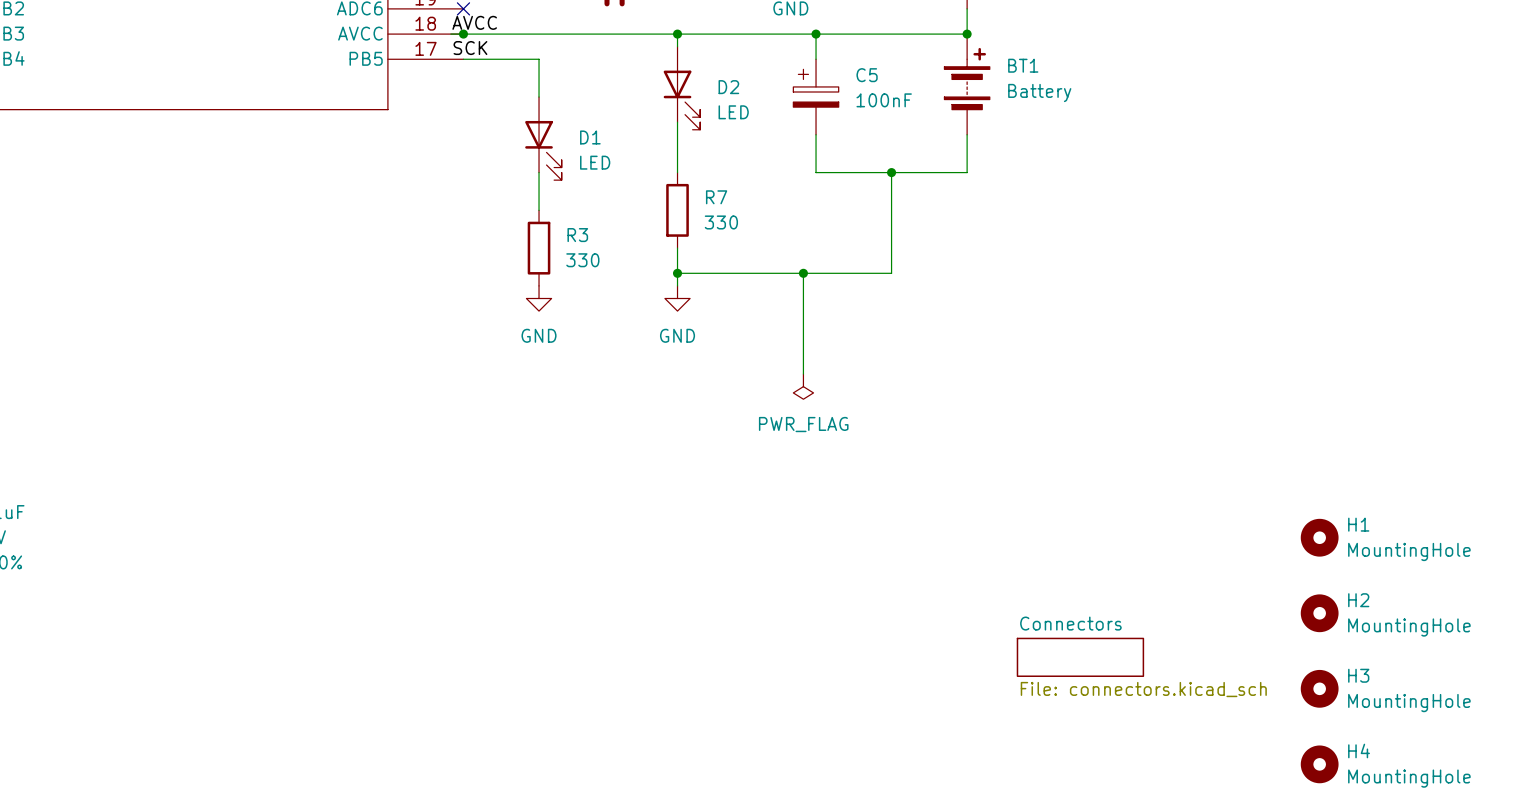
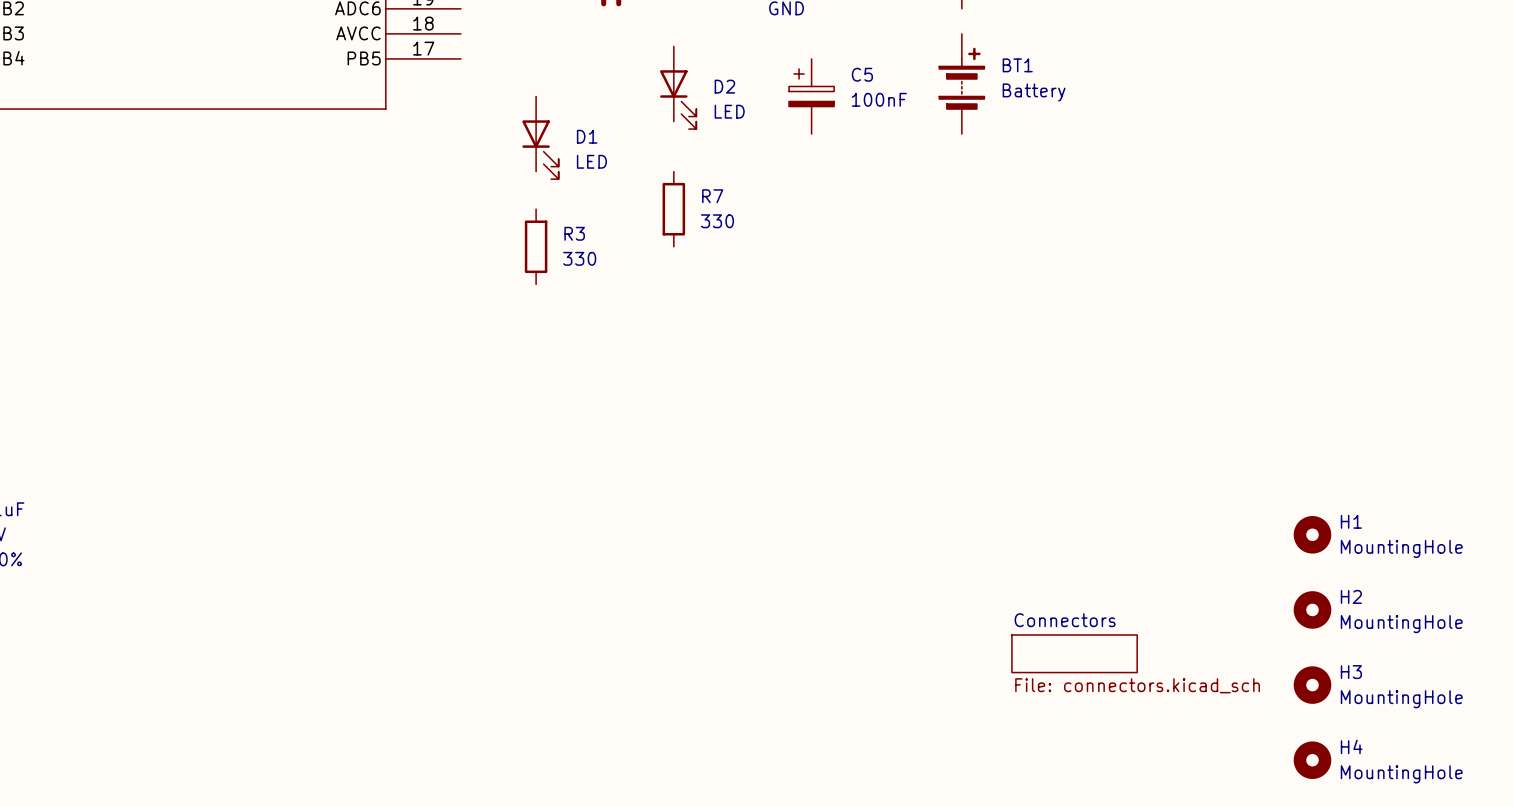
no-connect mark: (463, 8) -> none
wire: (967, 8) (967, 34) (450, 34) -> none
label: AVCC (474, 22) -> none
junction: (463, 34) -> none
wire: (677, 34) (677, 46) -> none
junction: (677, 34) -> none
wire: (816, 34) (816, 59) -> none
junction: (816, 34) -> none
junction: (967, 34) -> none
label: SCK (470, 48) -> none
wire: (463, 59) (539, 59) (539, 97) -> none
wire: (677, 122) (677, 172) -> none
wire: (816, 134) (816, 172) (967, 172) (967, 134) -> none
wire: (539, 172) (539, 210) -> none
wire: (891, 172) (891, 273) (677, 273) -> none
junction: (891, 172) -> none
wire: (677, 248) (677, 285) -> none
junction: (677, 273) -> none
wire: (803, 273) (803, 374) -> none
junction: (803, 273) -> none
power symbol: GND (539, 298) -> none
power symbol: GND (677, 298) -> none
power symbol: PWR_FLAG (803, 386) -> none

